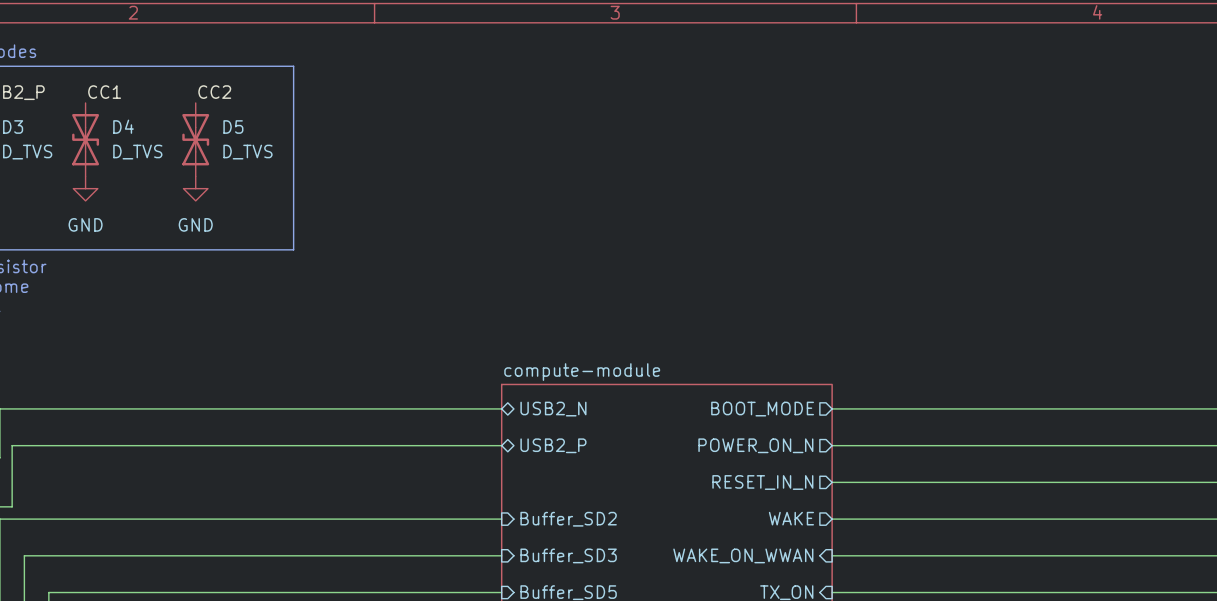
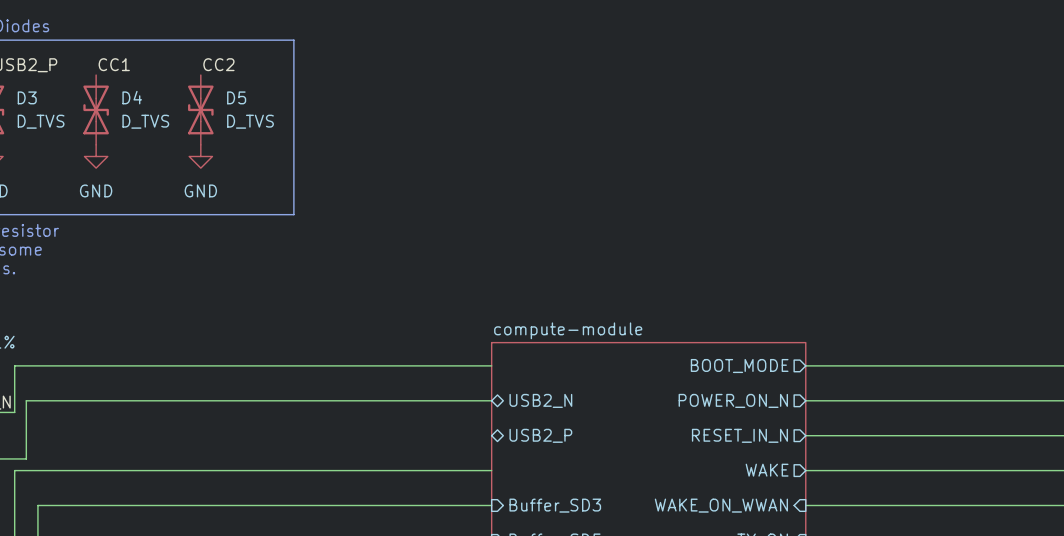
sheet pin: USB2_N (553, 409) -> none
sheet pin: USB2_P (553, 445) -> USB2_N (540, 400)
sheet pin: none -> USB2_P (540, 435)
sheet pin: Buffer_SD2 (568, 519) -> none

